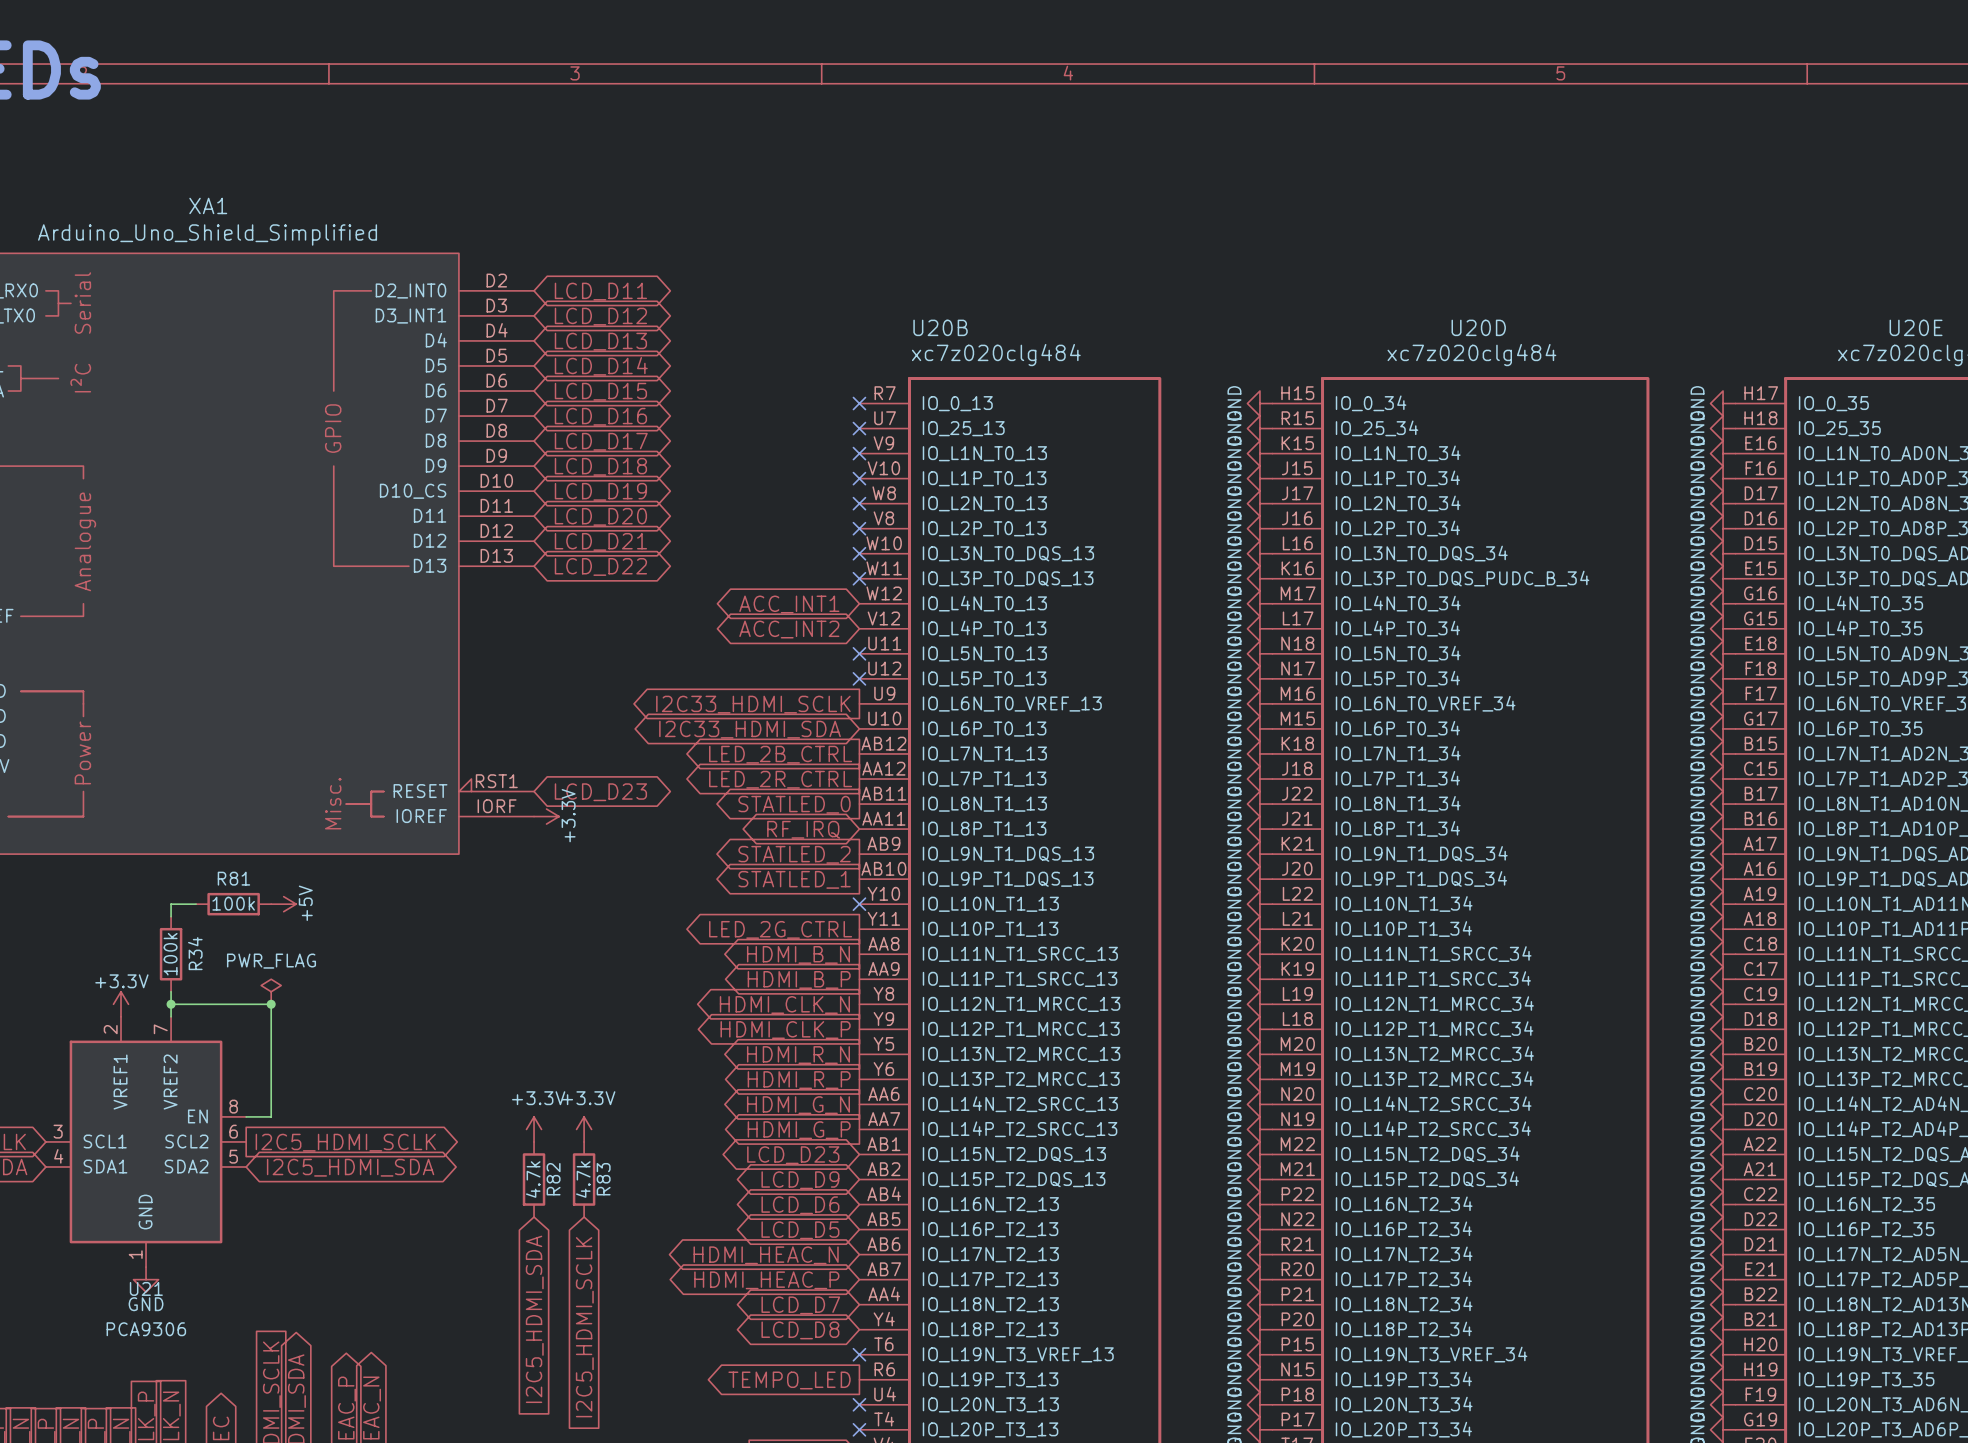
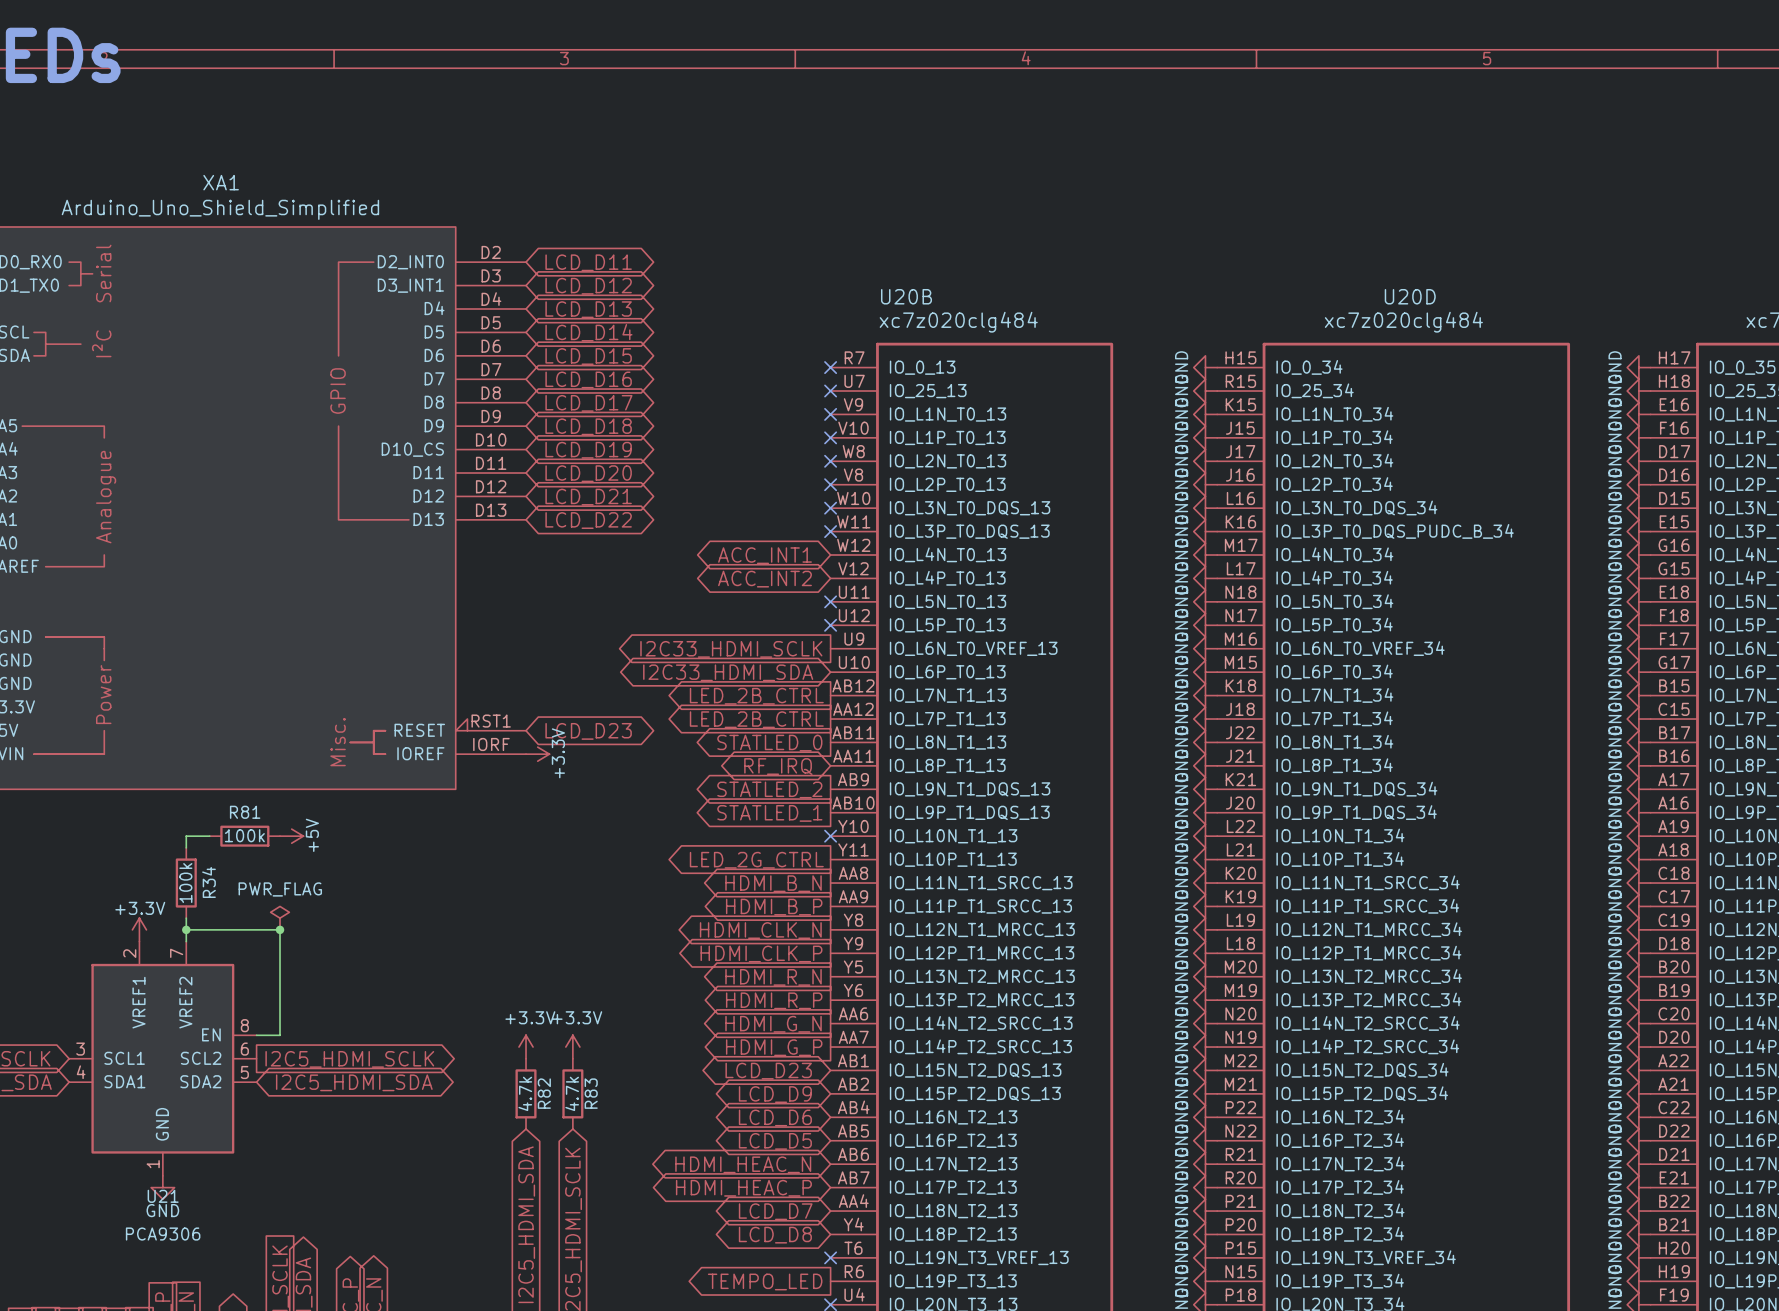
global label: LED_2R_CTRL (780, 779) -> LED_2B_CTRL (756, 719)

